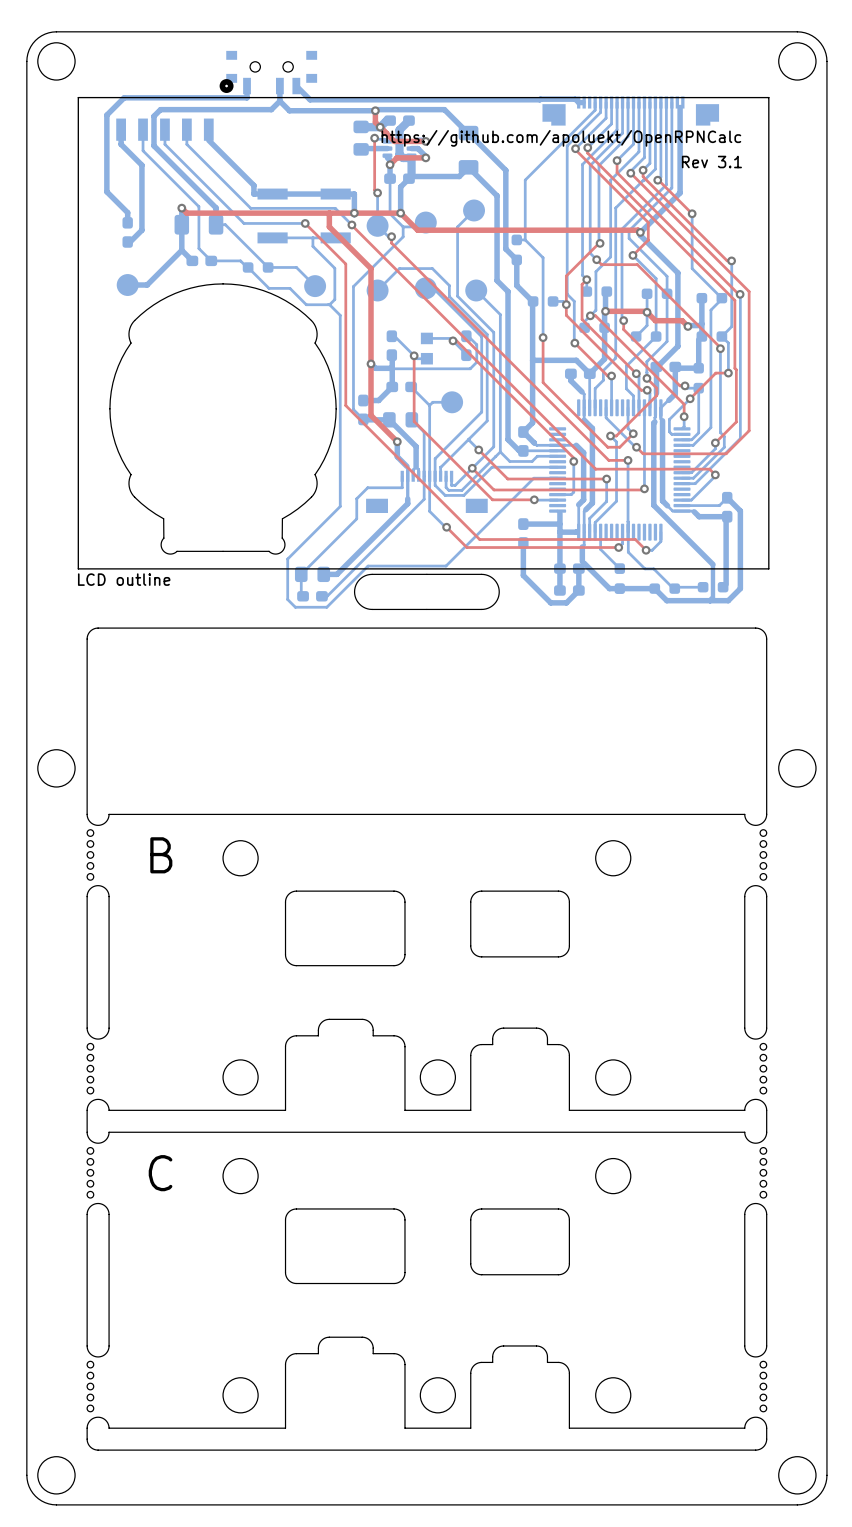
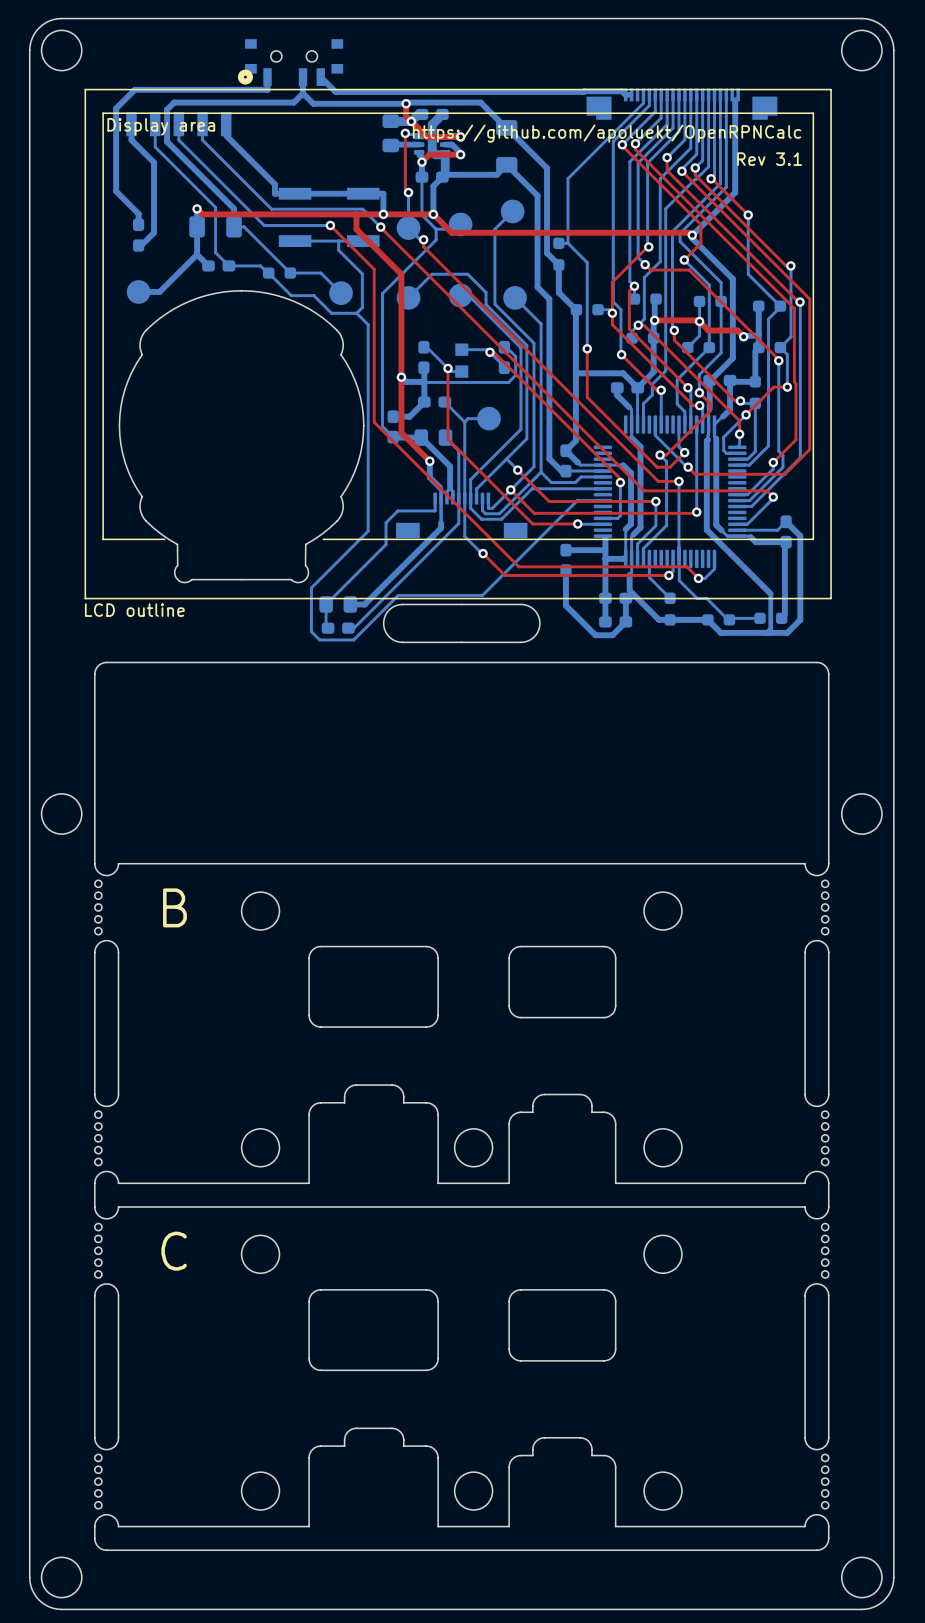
text: none -> Display area (161, 126)
line: none -> (164, 539) (103, 539) (103, 113) (813, 113) (813, 539) (323, 539)

